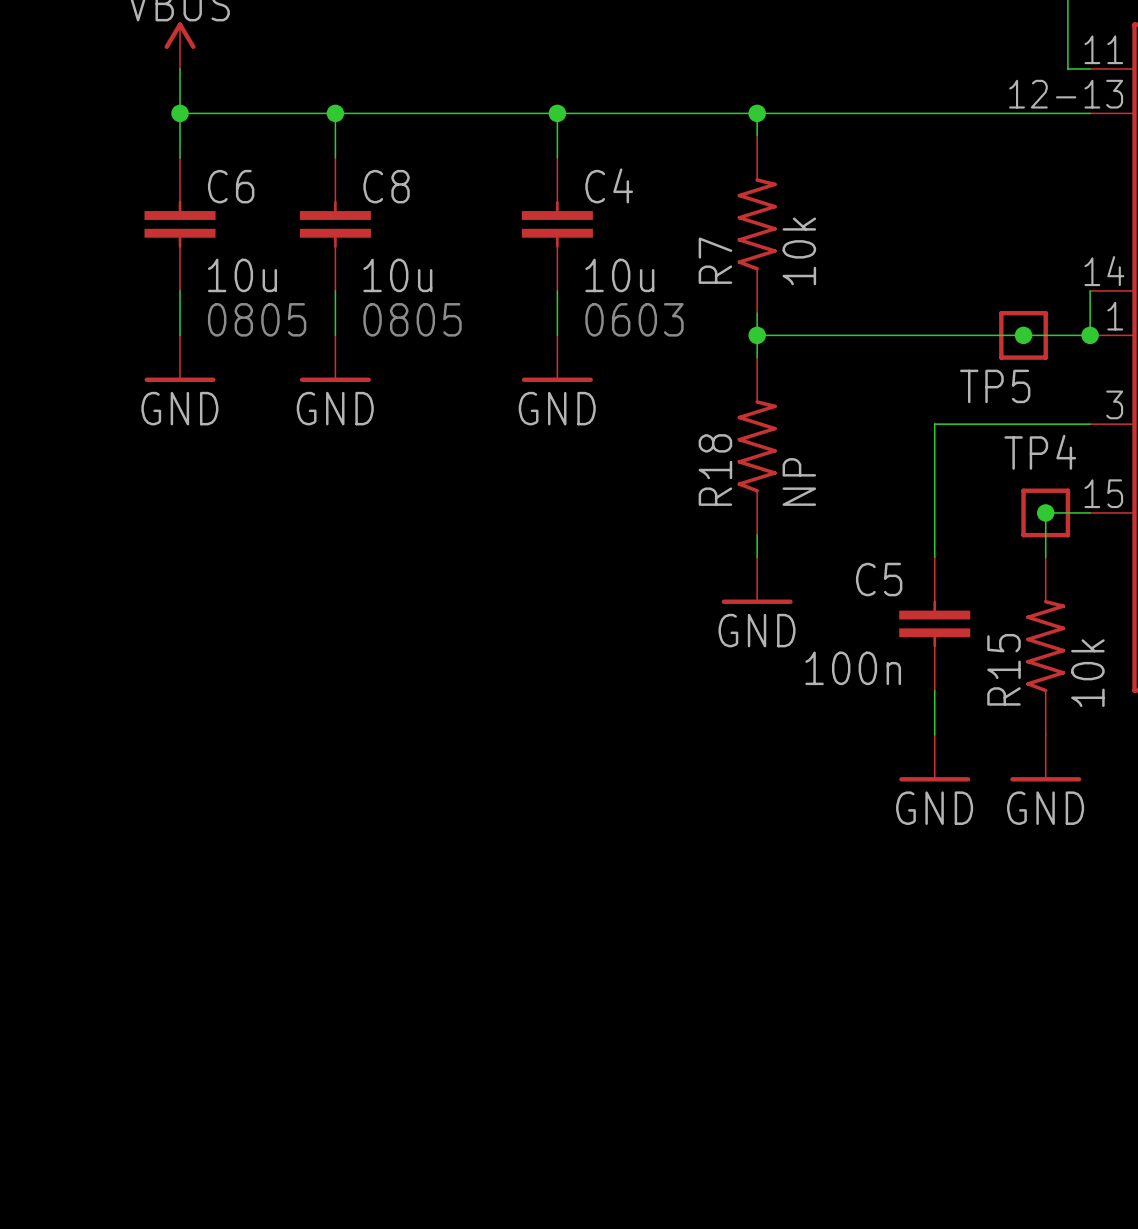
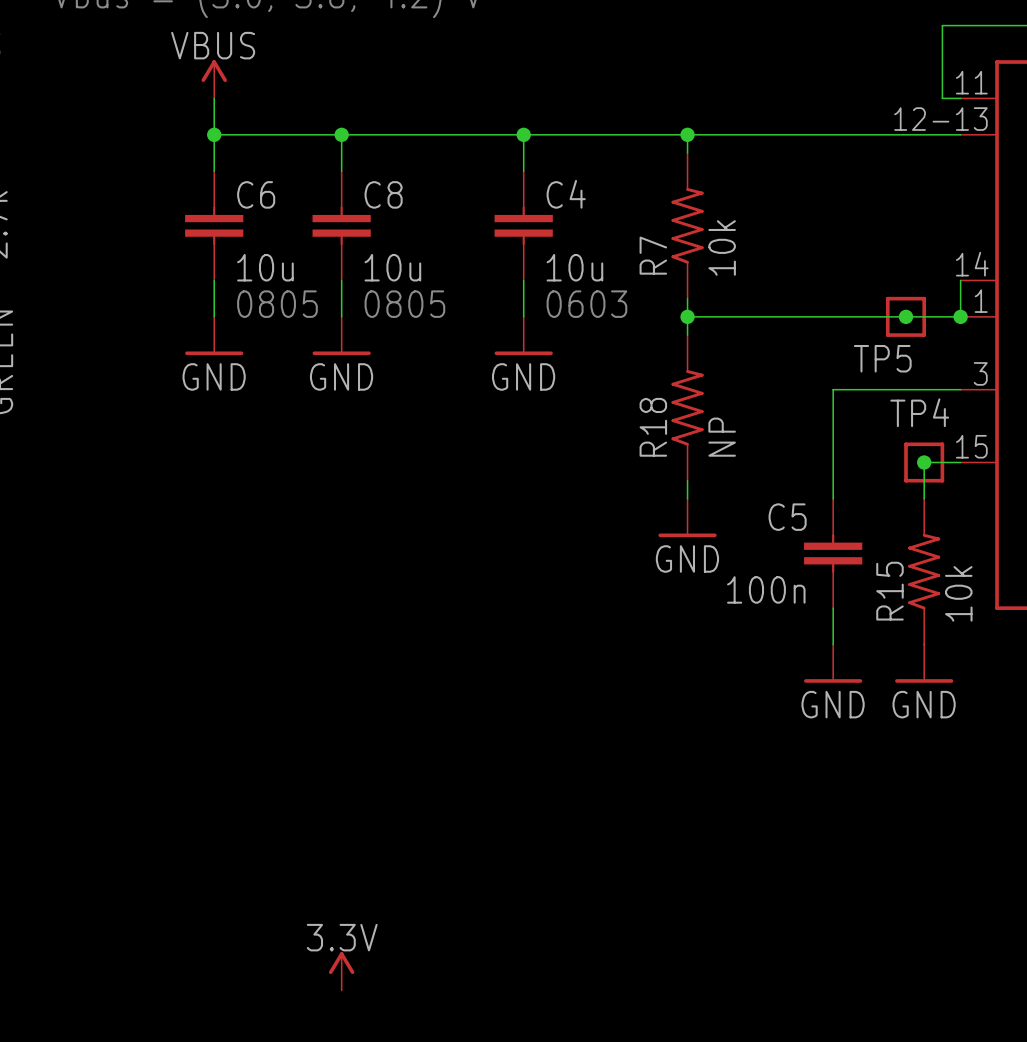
power symbol: none -> 3.3V (341, 971)

